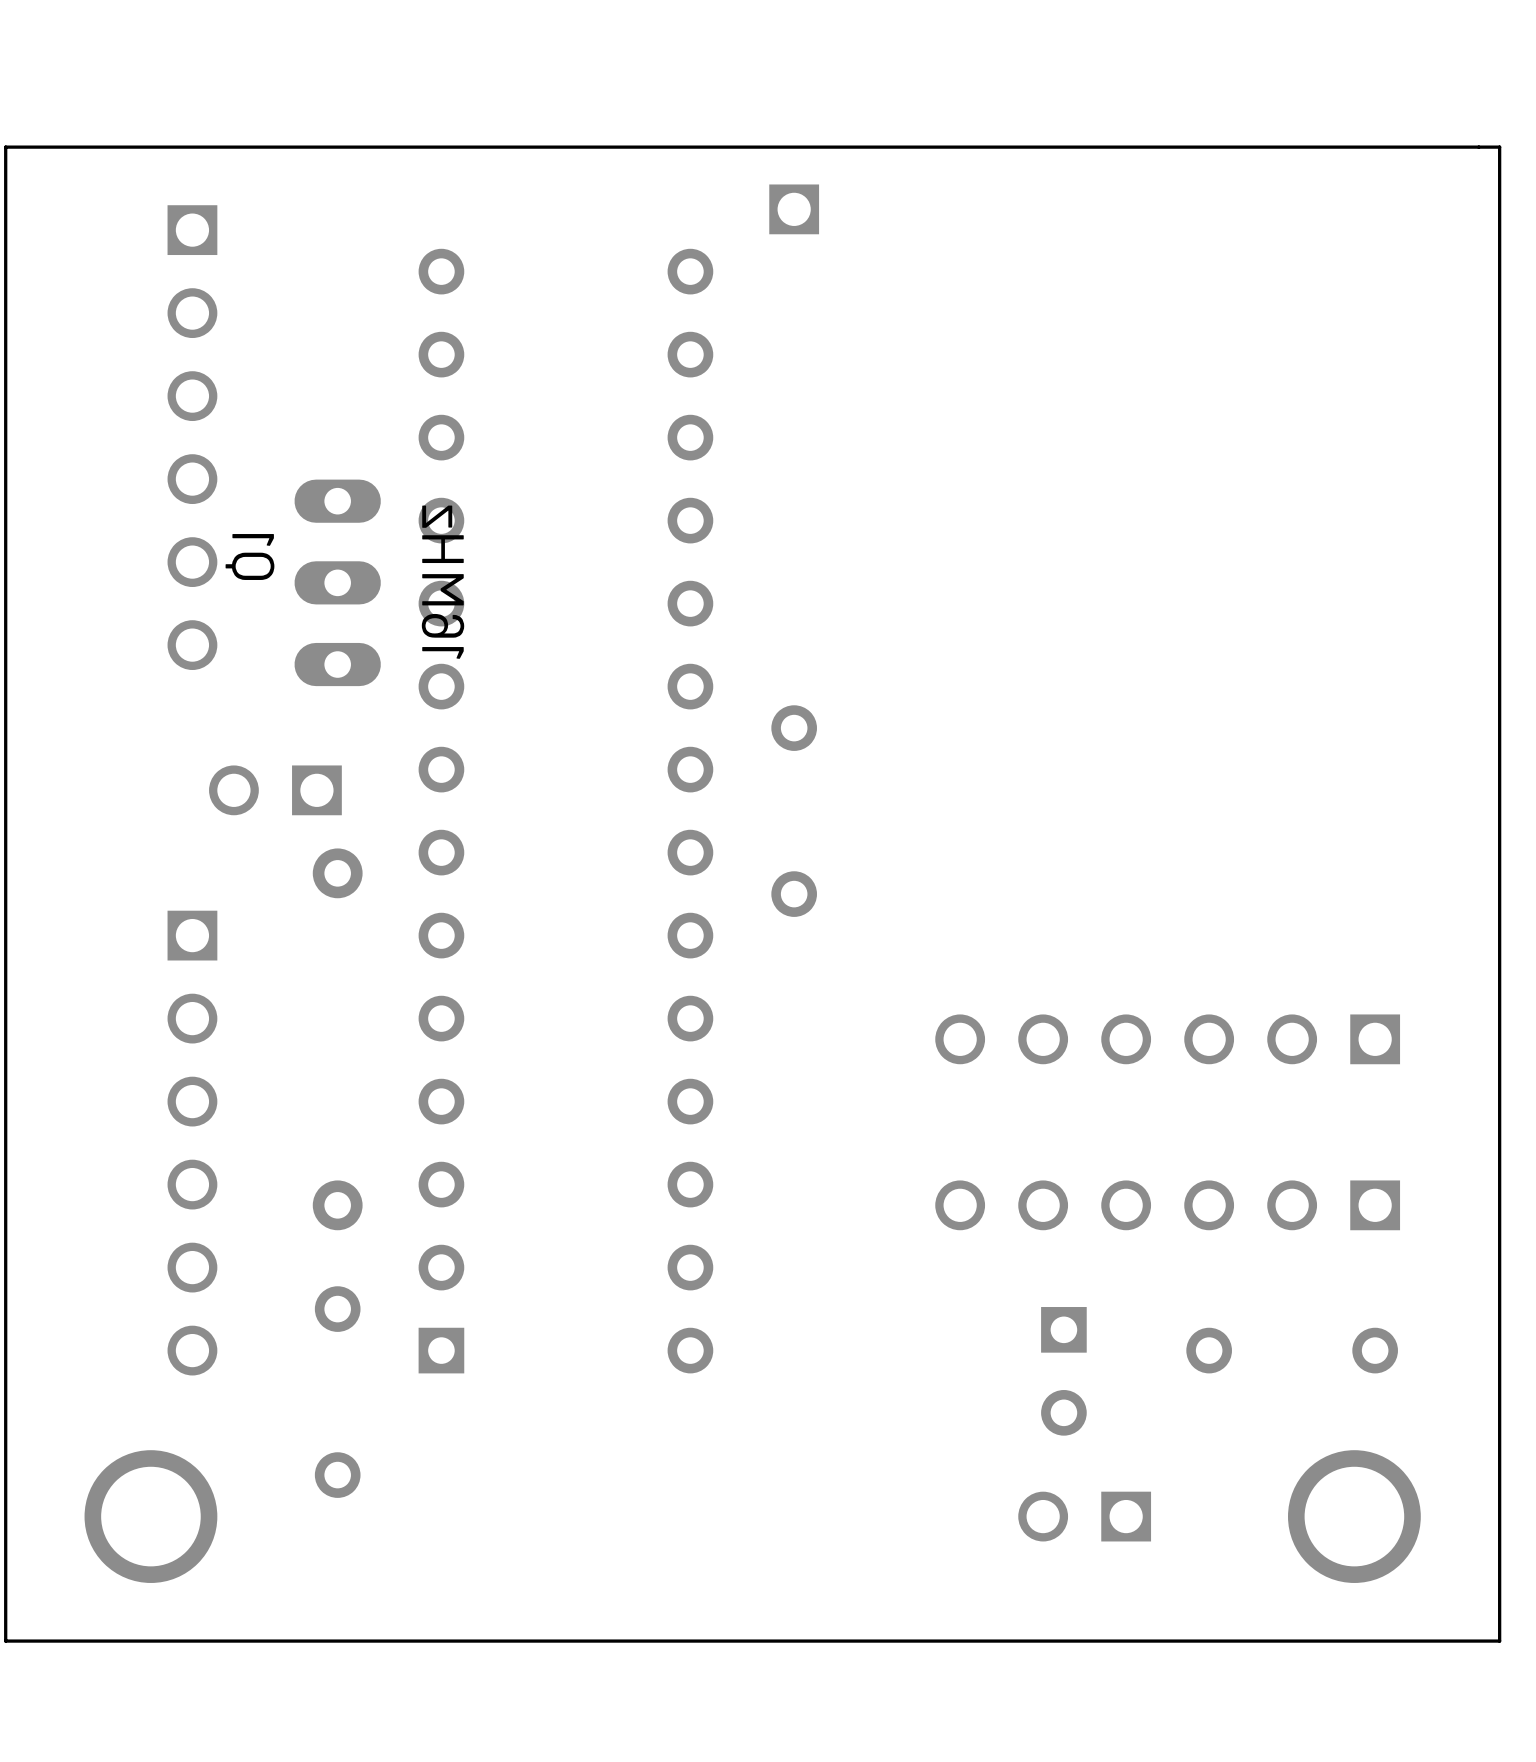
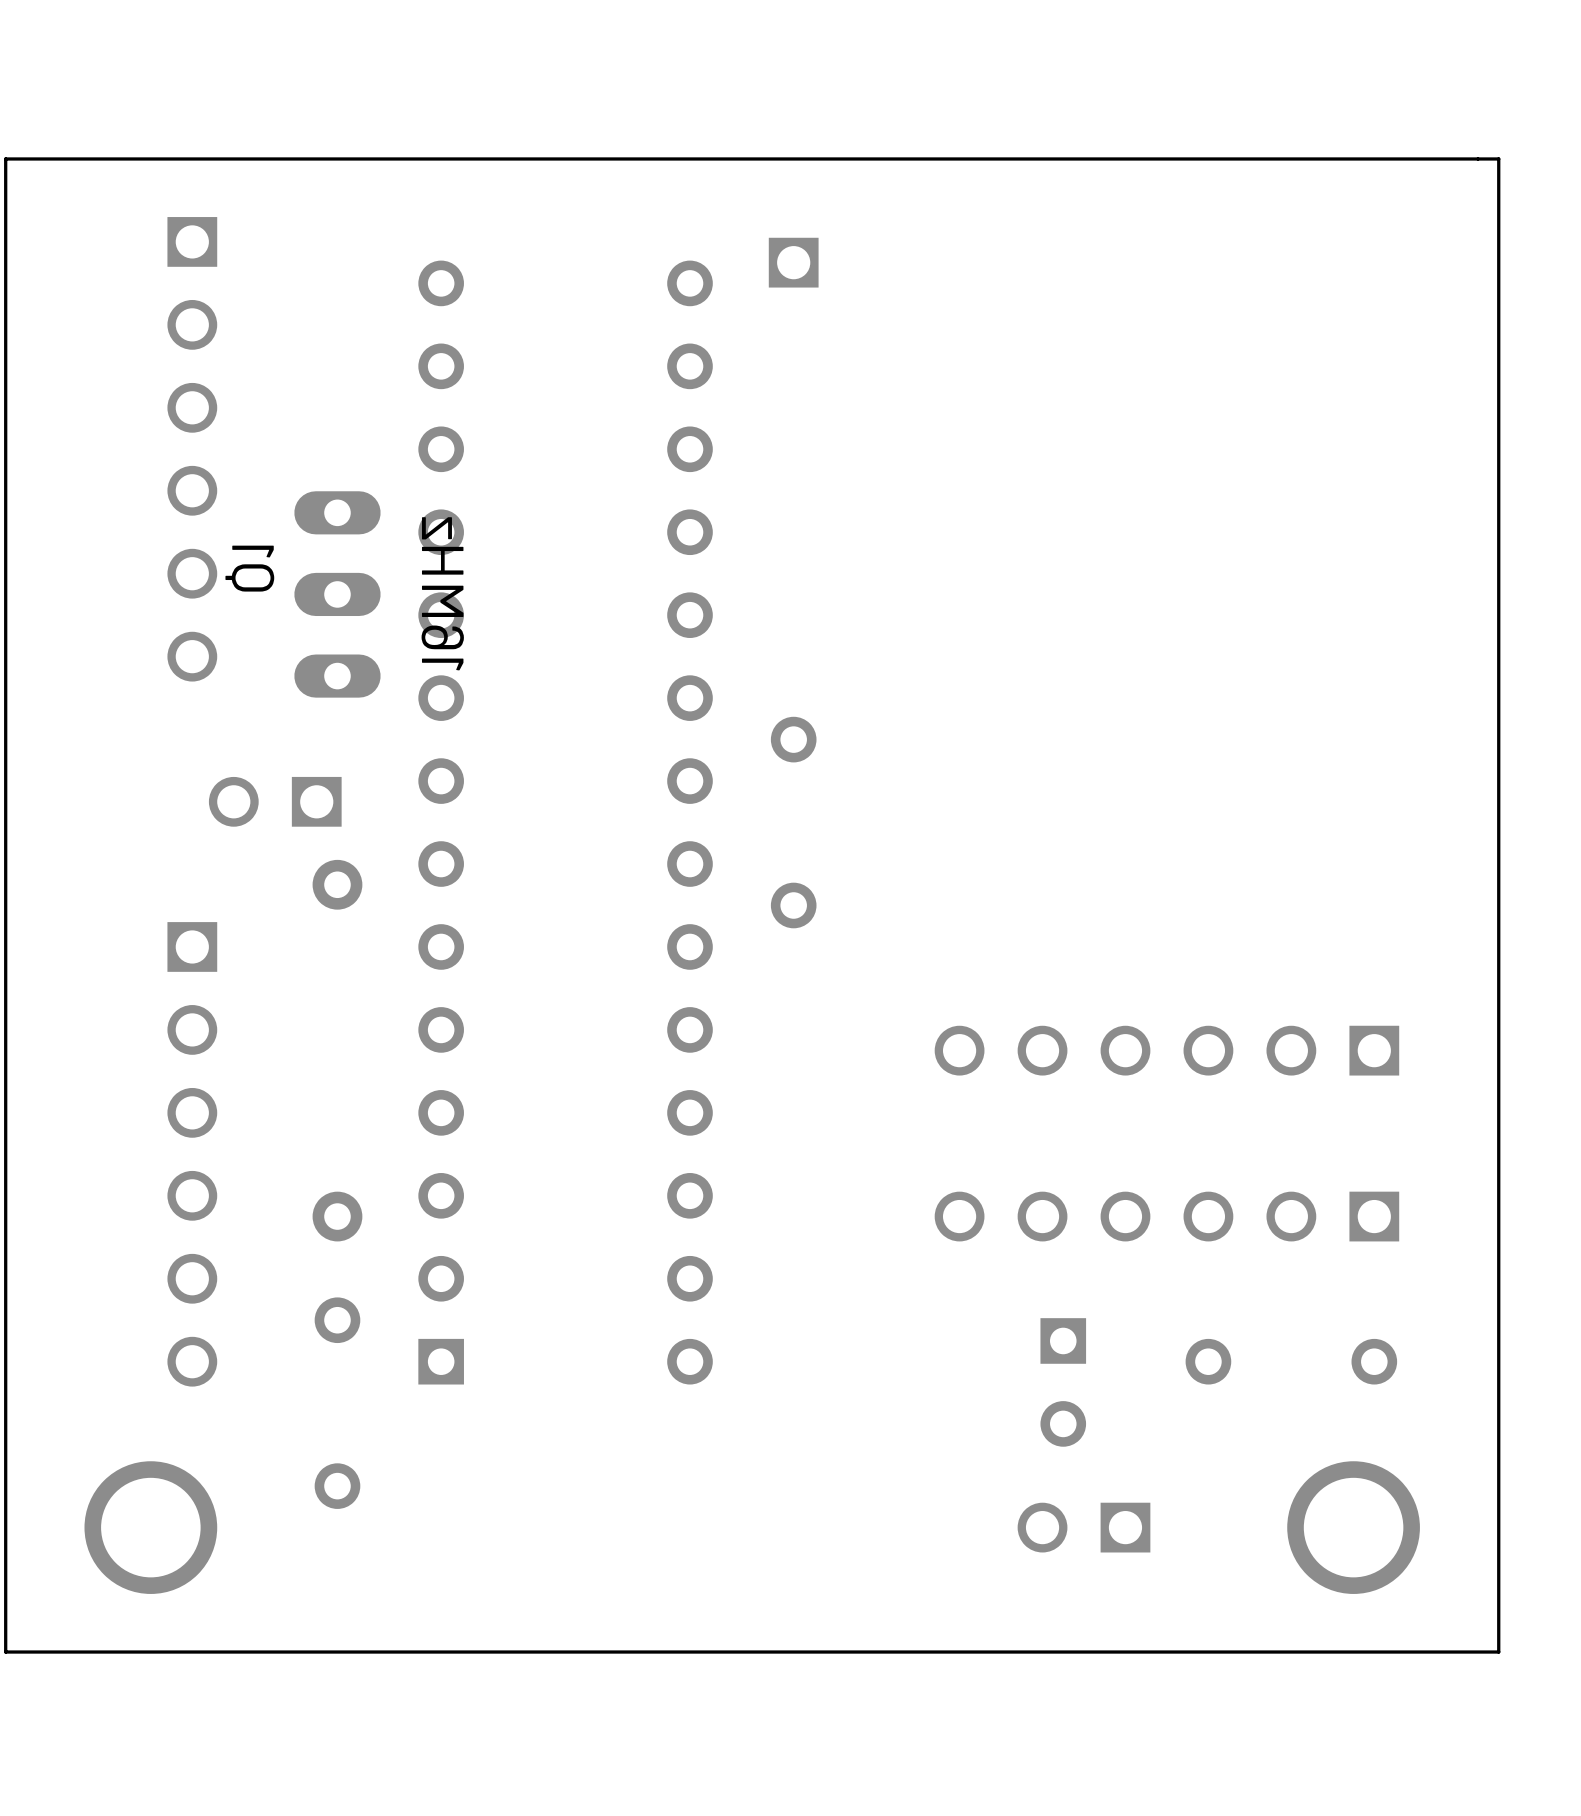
part position: (794, 209) -> (793, 262)

